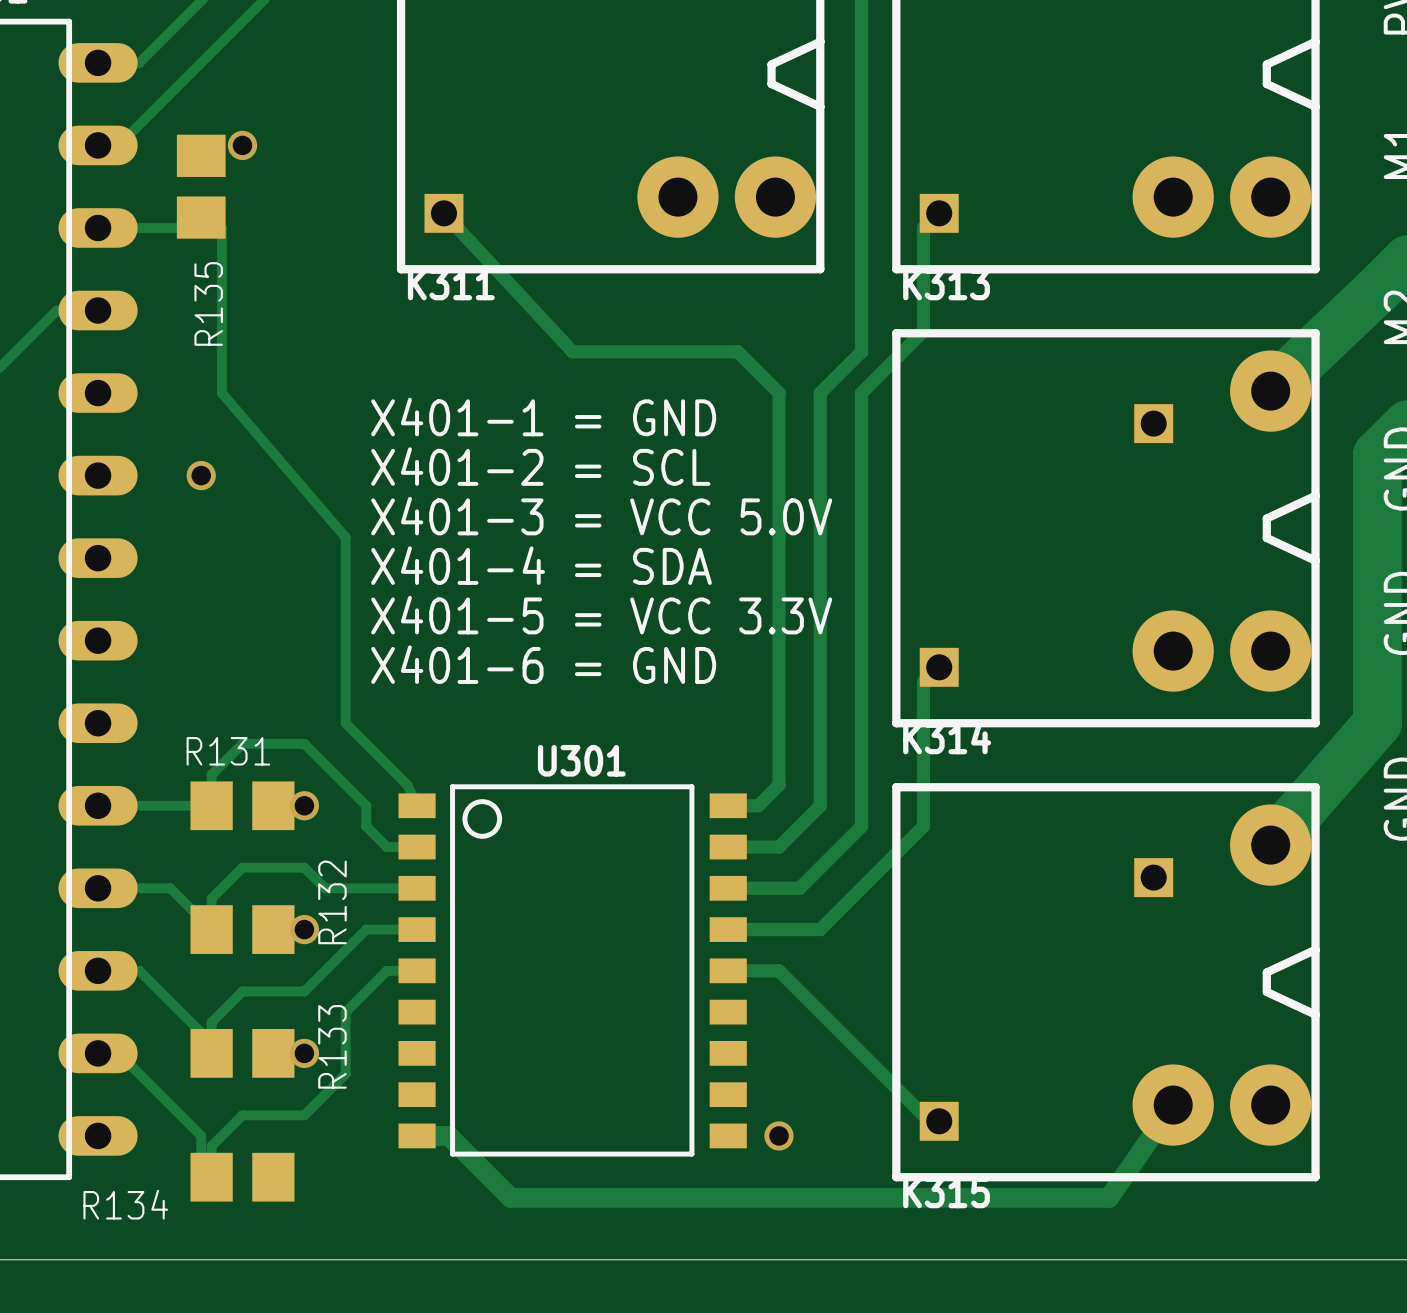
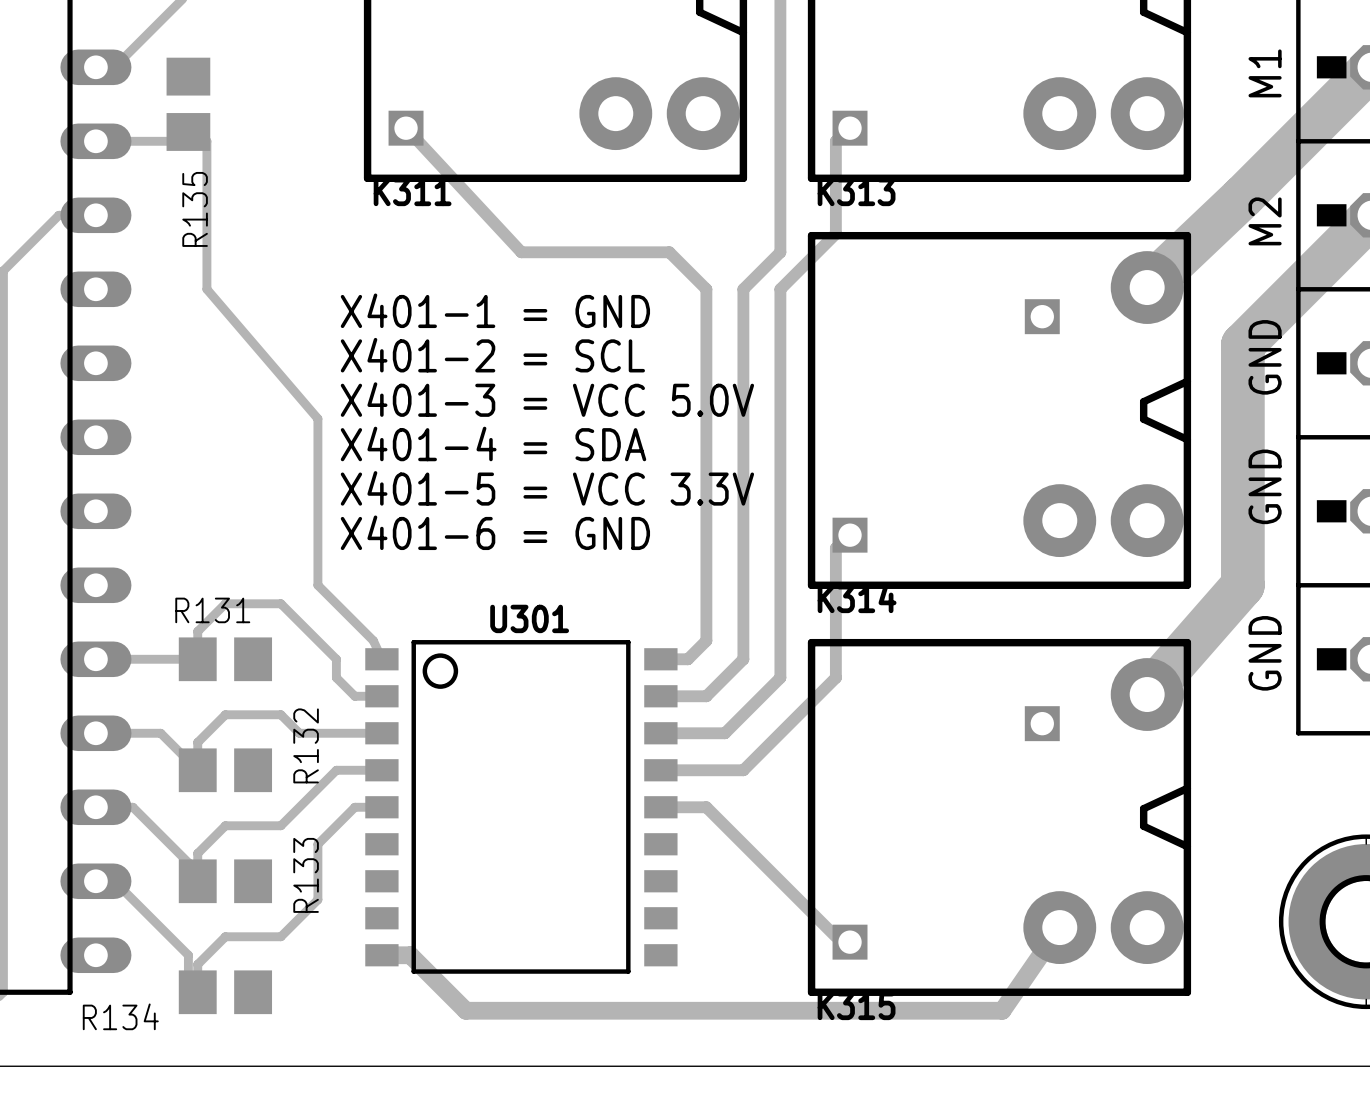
via: (242, 145) -> none
via: (201, 475) -> none
via: (304, 805) -> none
via: (304, 929) -> none
via: (304, 1053) -> none
via: (779, 1135) -> none

